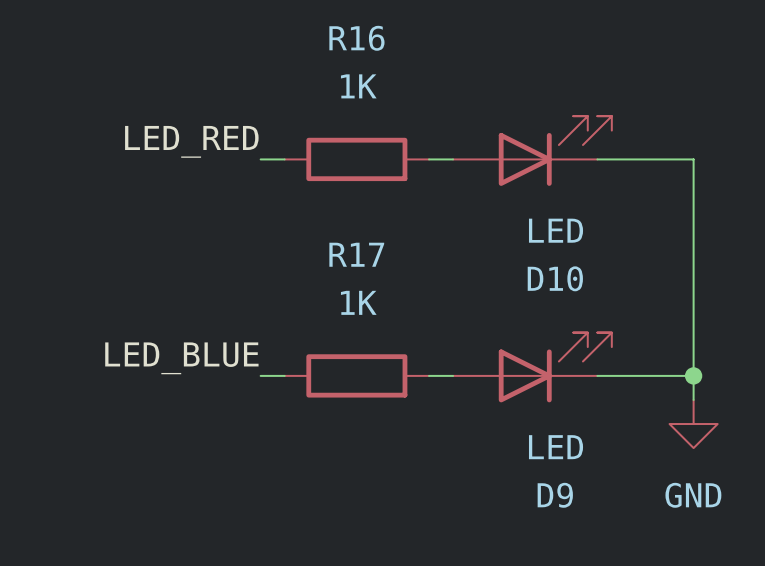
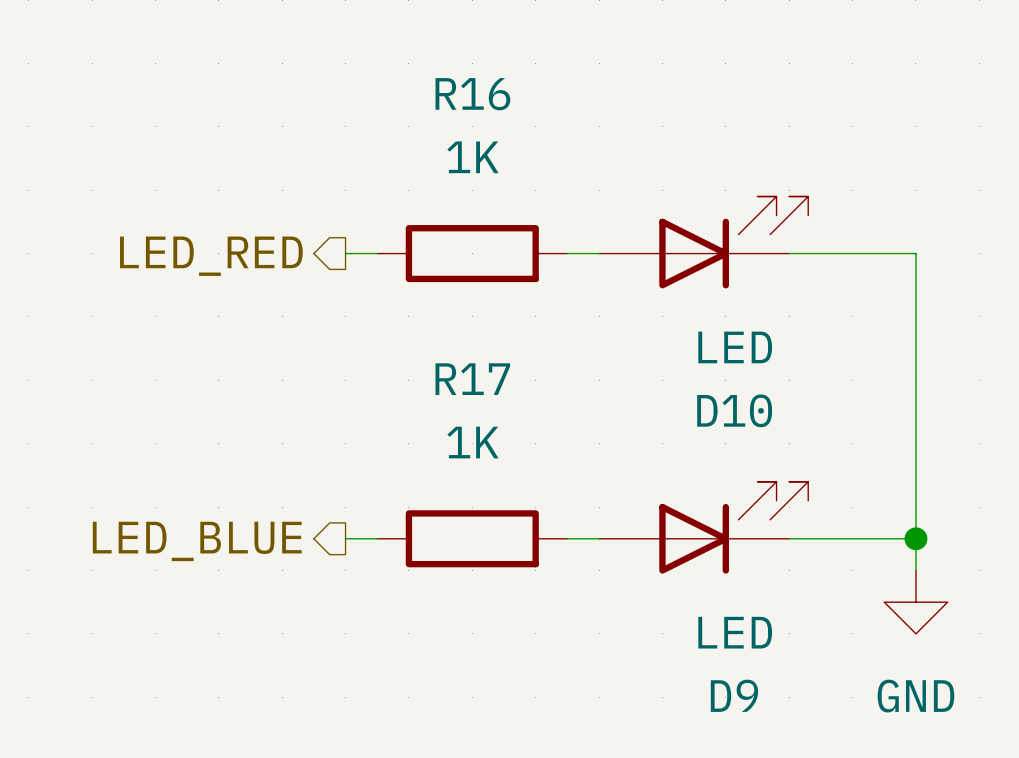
label: LED_RED (191, 141) -> none
hierarchical label: none -> LED_RED (211, 256)
label: LED_BLUE (181, 358) -> none
hierarchical label: none -> LED_BLUE (197, 541)

